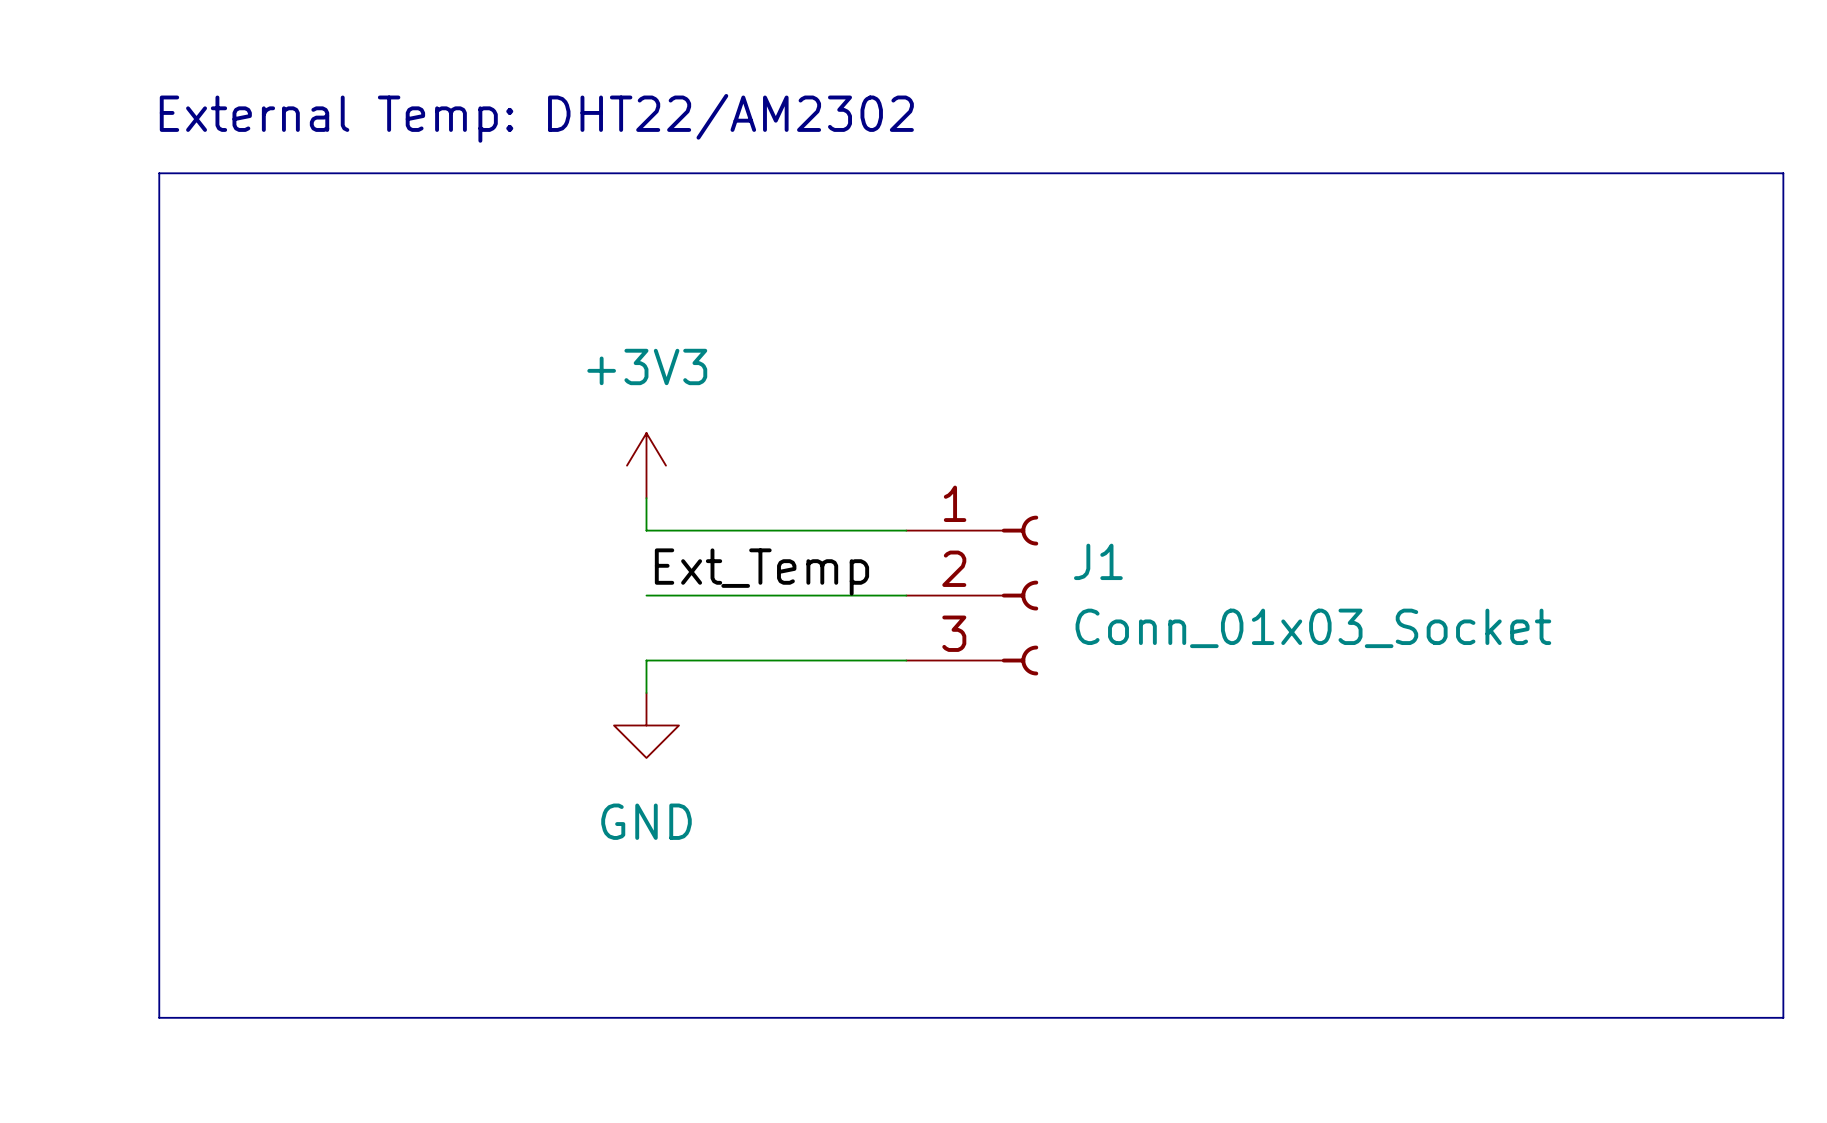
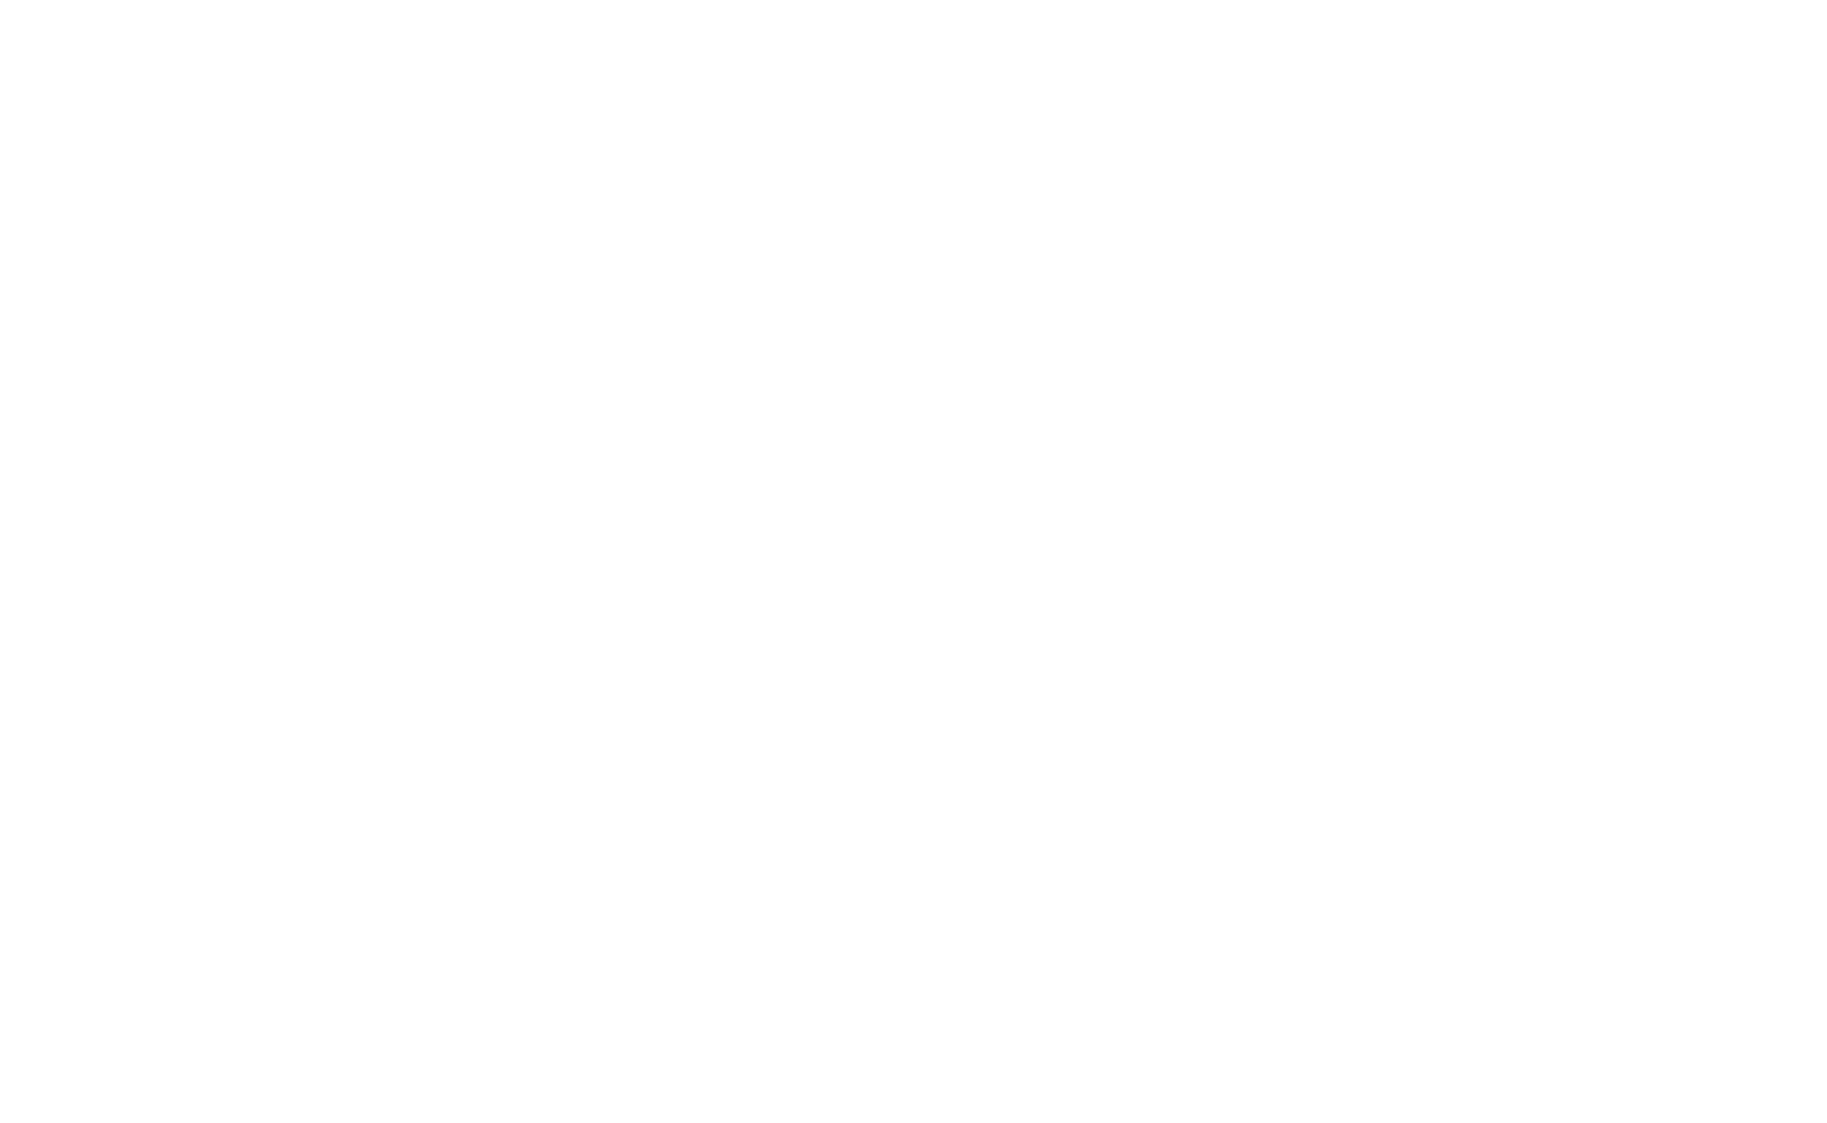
text: External Temp: DHT22/AM2302 (536, 118) -> none
line: (159, 173) (1783, 173) (1783, 1017) (159, 1017) (159, 173) -> none
power symbol: +3V3 (646, 465) -> none
wire: (646, 498) (646, 530) (906, 530) -> none
label: Ext_Temp (761, 571) -> none
wire: (646, 595) (906, 595) -> none
J1: Conn_01x03_Socket (972, 595) -> none
wire: (906, 660) (646, 660) (646, 693) -> none
power symbol: GND (646, 725) -> none

